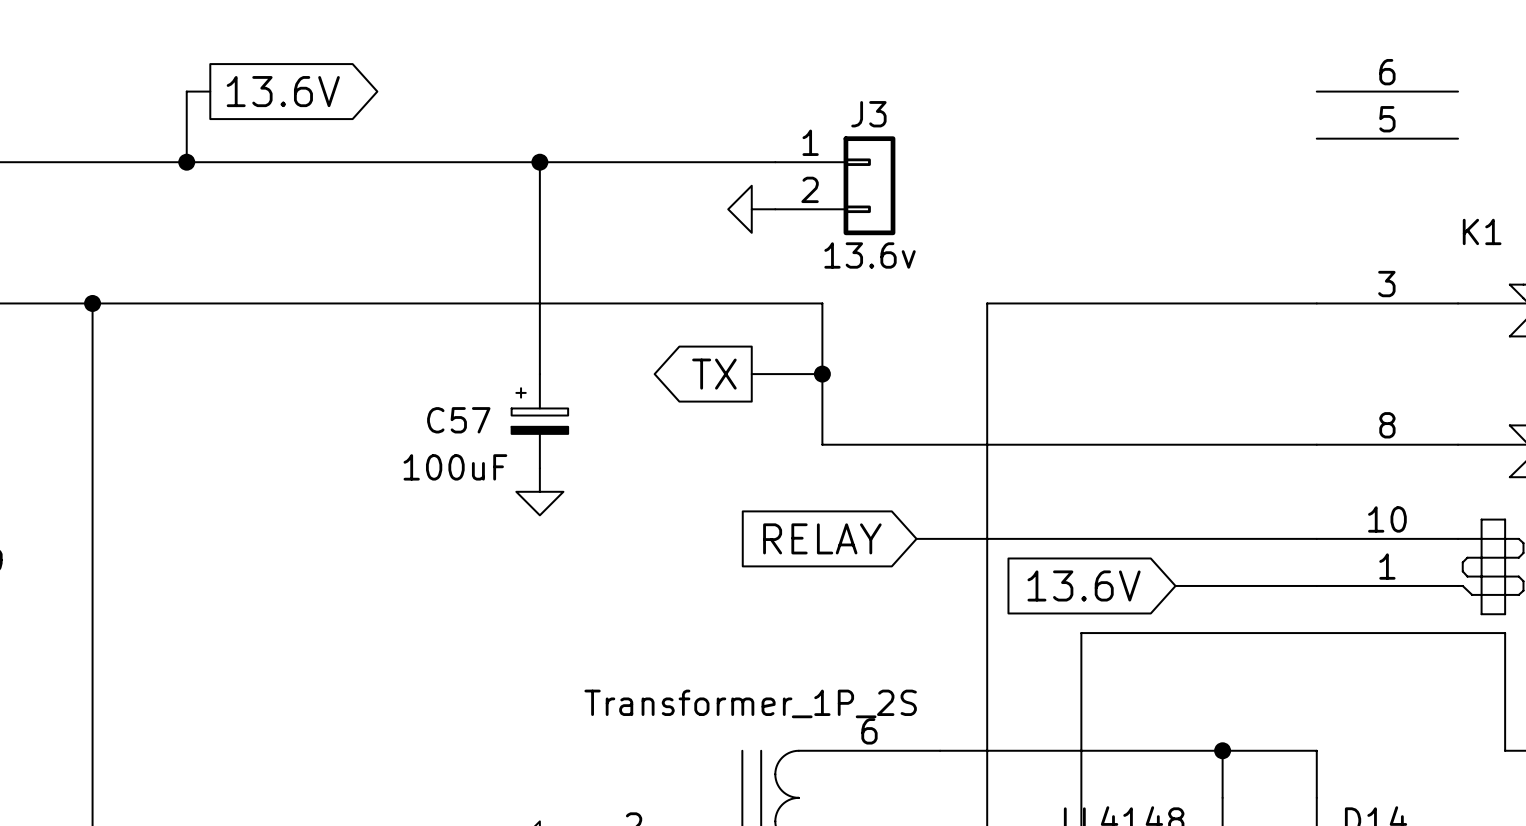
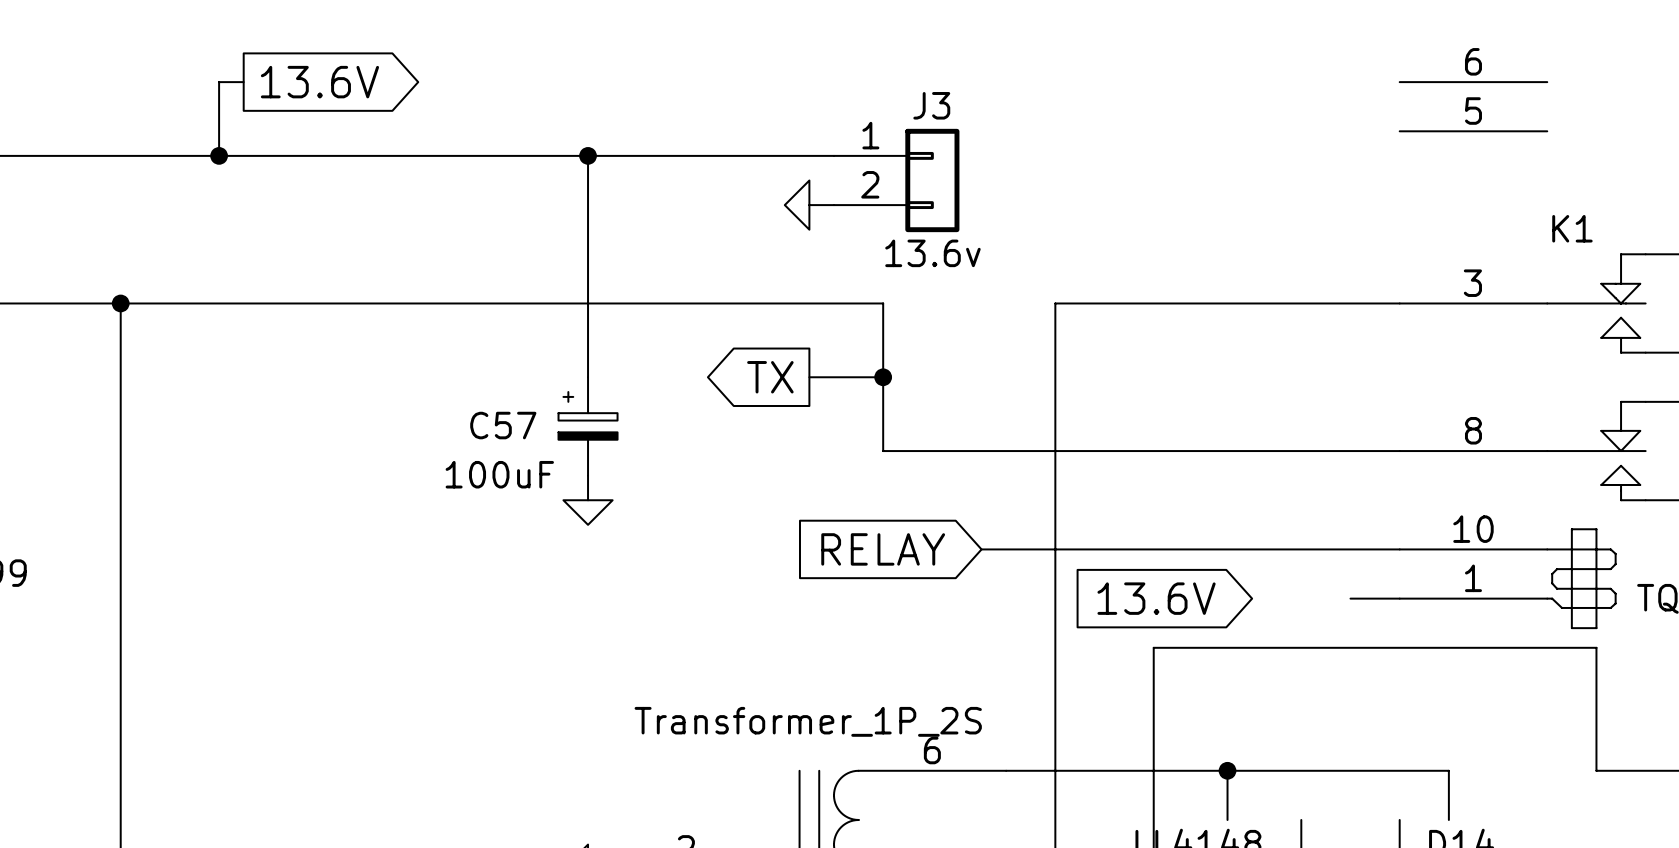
wire: (1175, 585) (1269, 585) -> none
wire: (1222, 750) (1222, 797) -> (1227, 770) (1227, 819)
junction position: (1222, 750) -> (1227, 770)
wire: (1316, 750) (1316, 797) -> (1399, 770) (1448, 770) (1448, 819)

